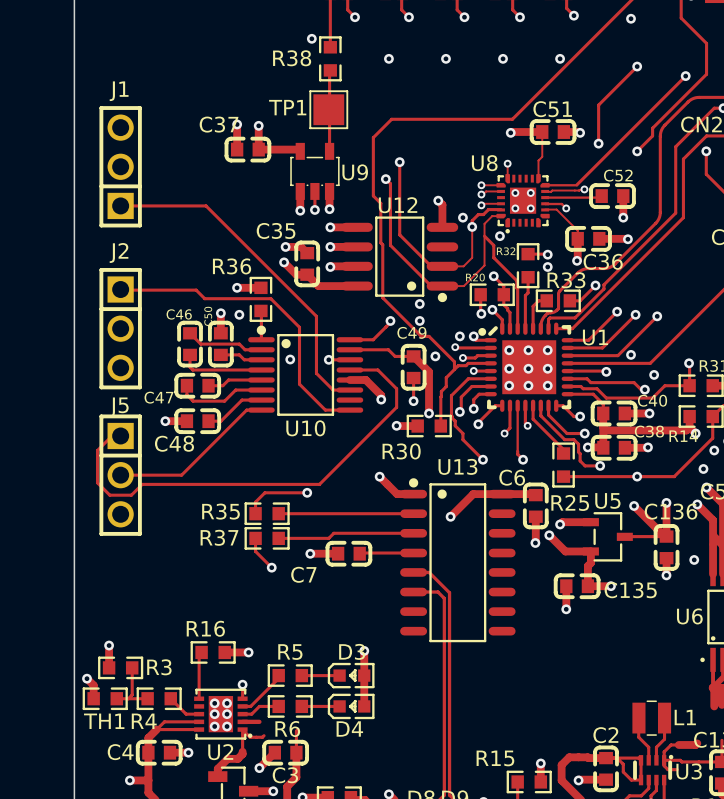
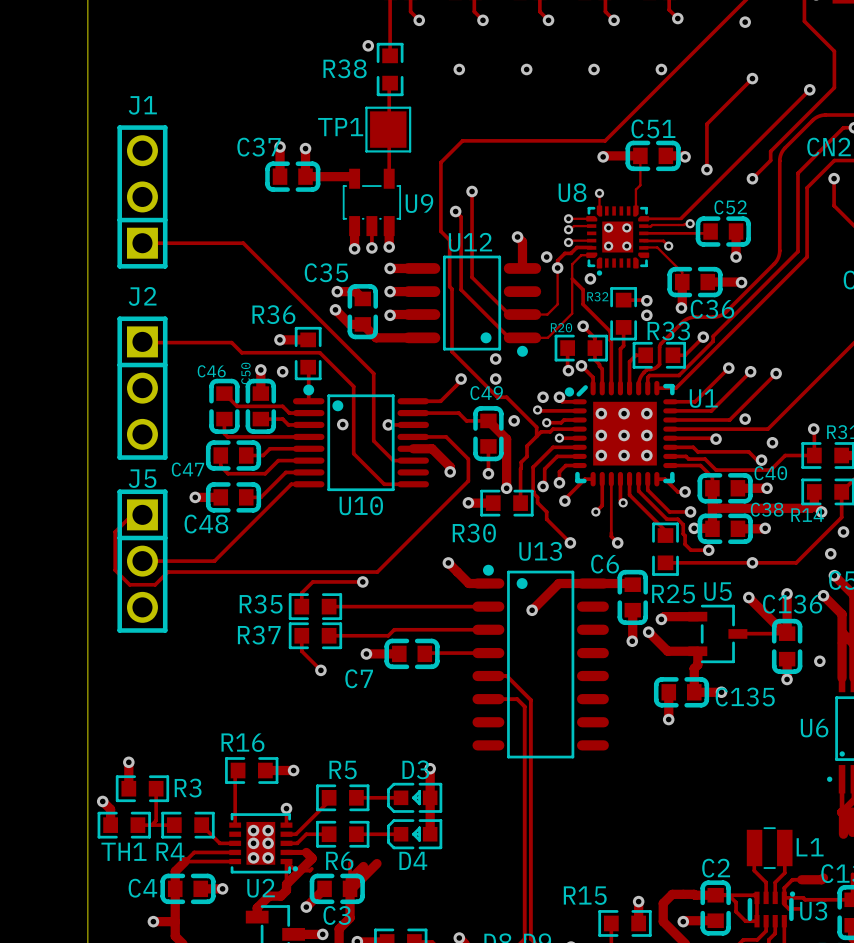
track: none -> (306, 852) (311, 858) (286, 884) (286, 887)
track: none -> (377, 863) (350, 888)
track: none -> (363, 866) (350, 879)

